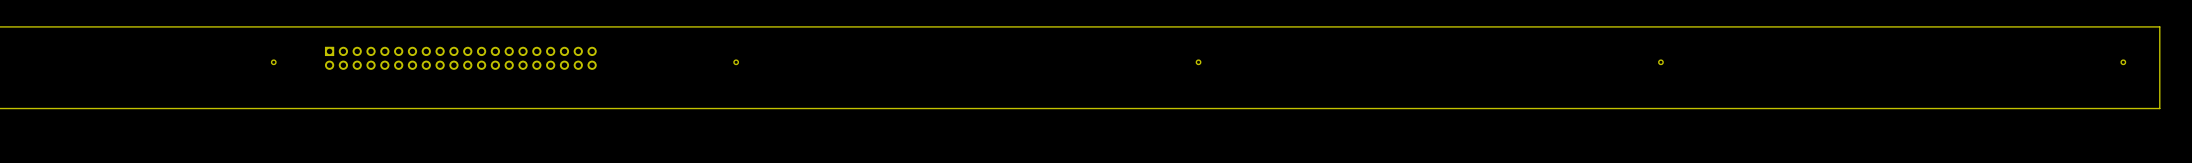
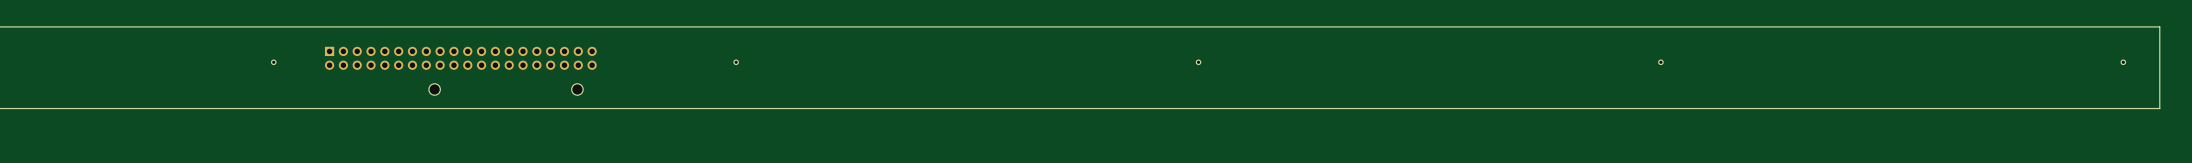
part: none -> (434, 89)
part: none -> (577, 89)

